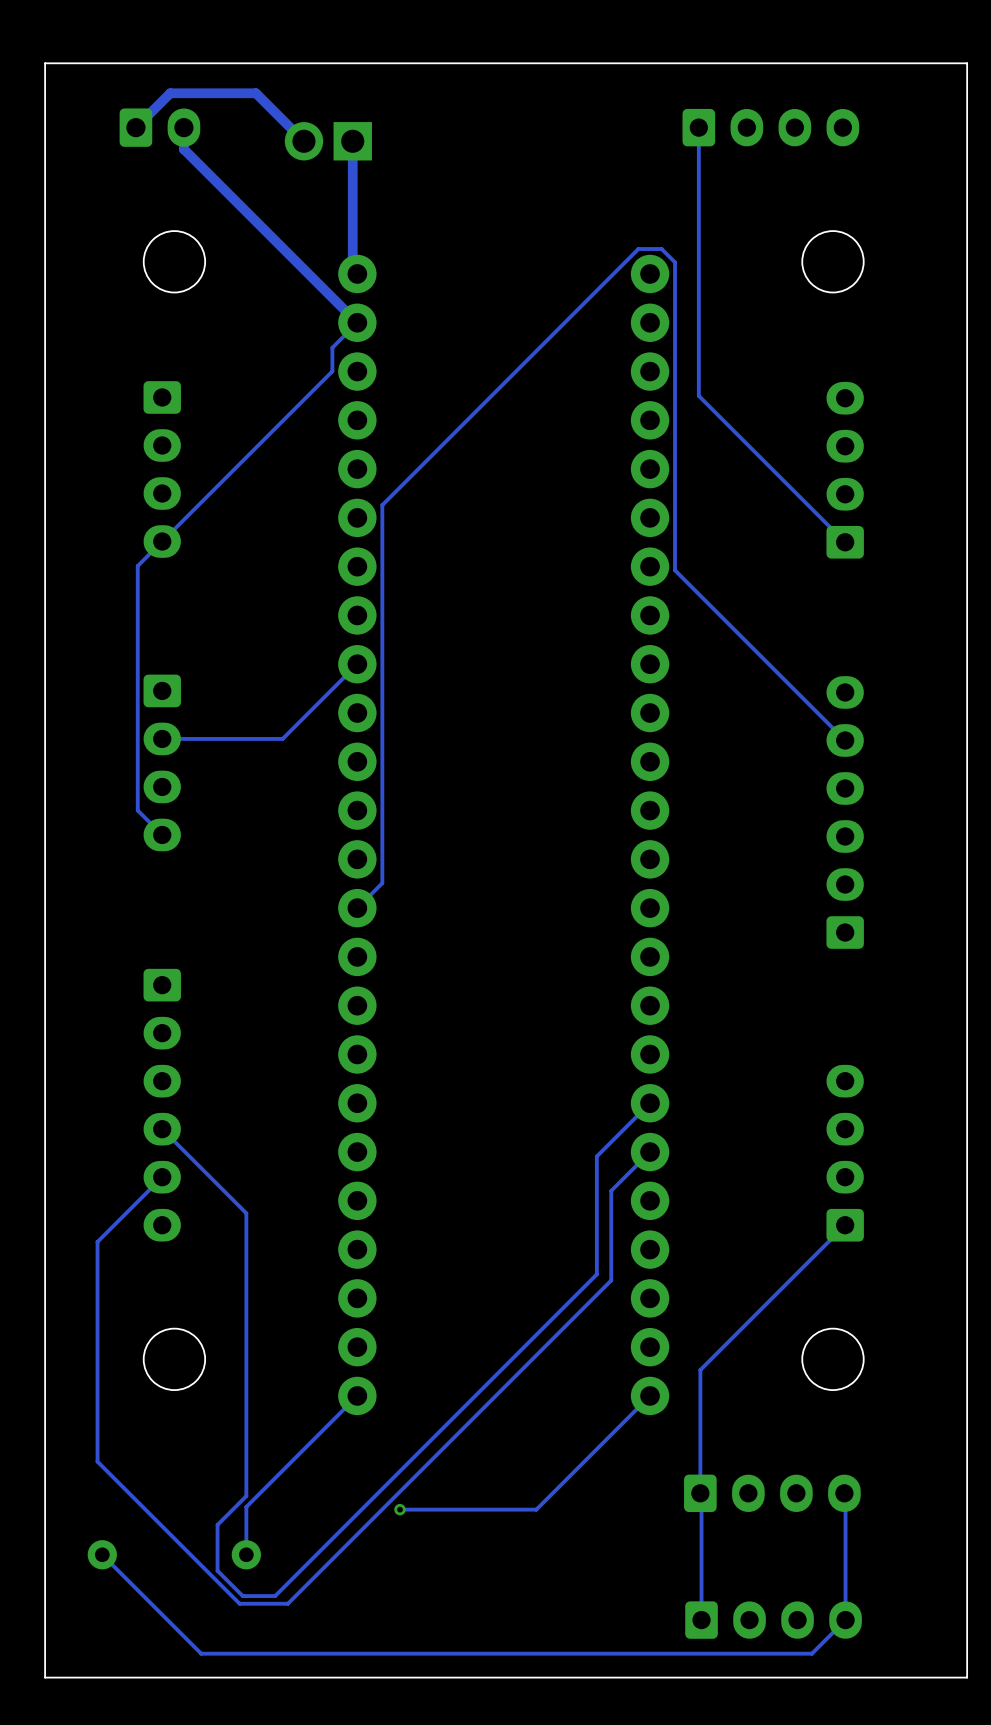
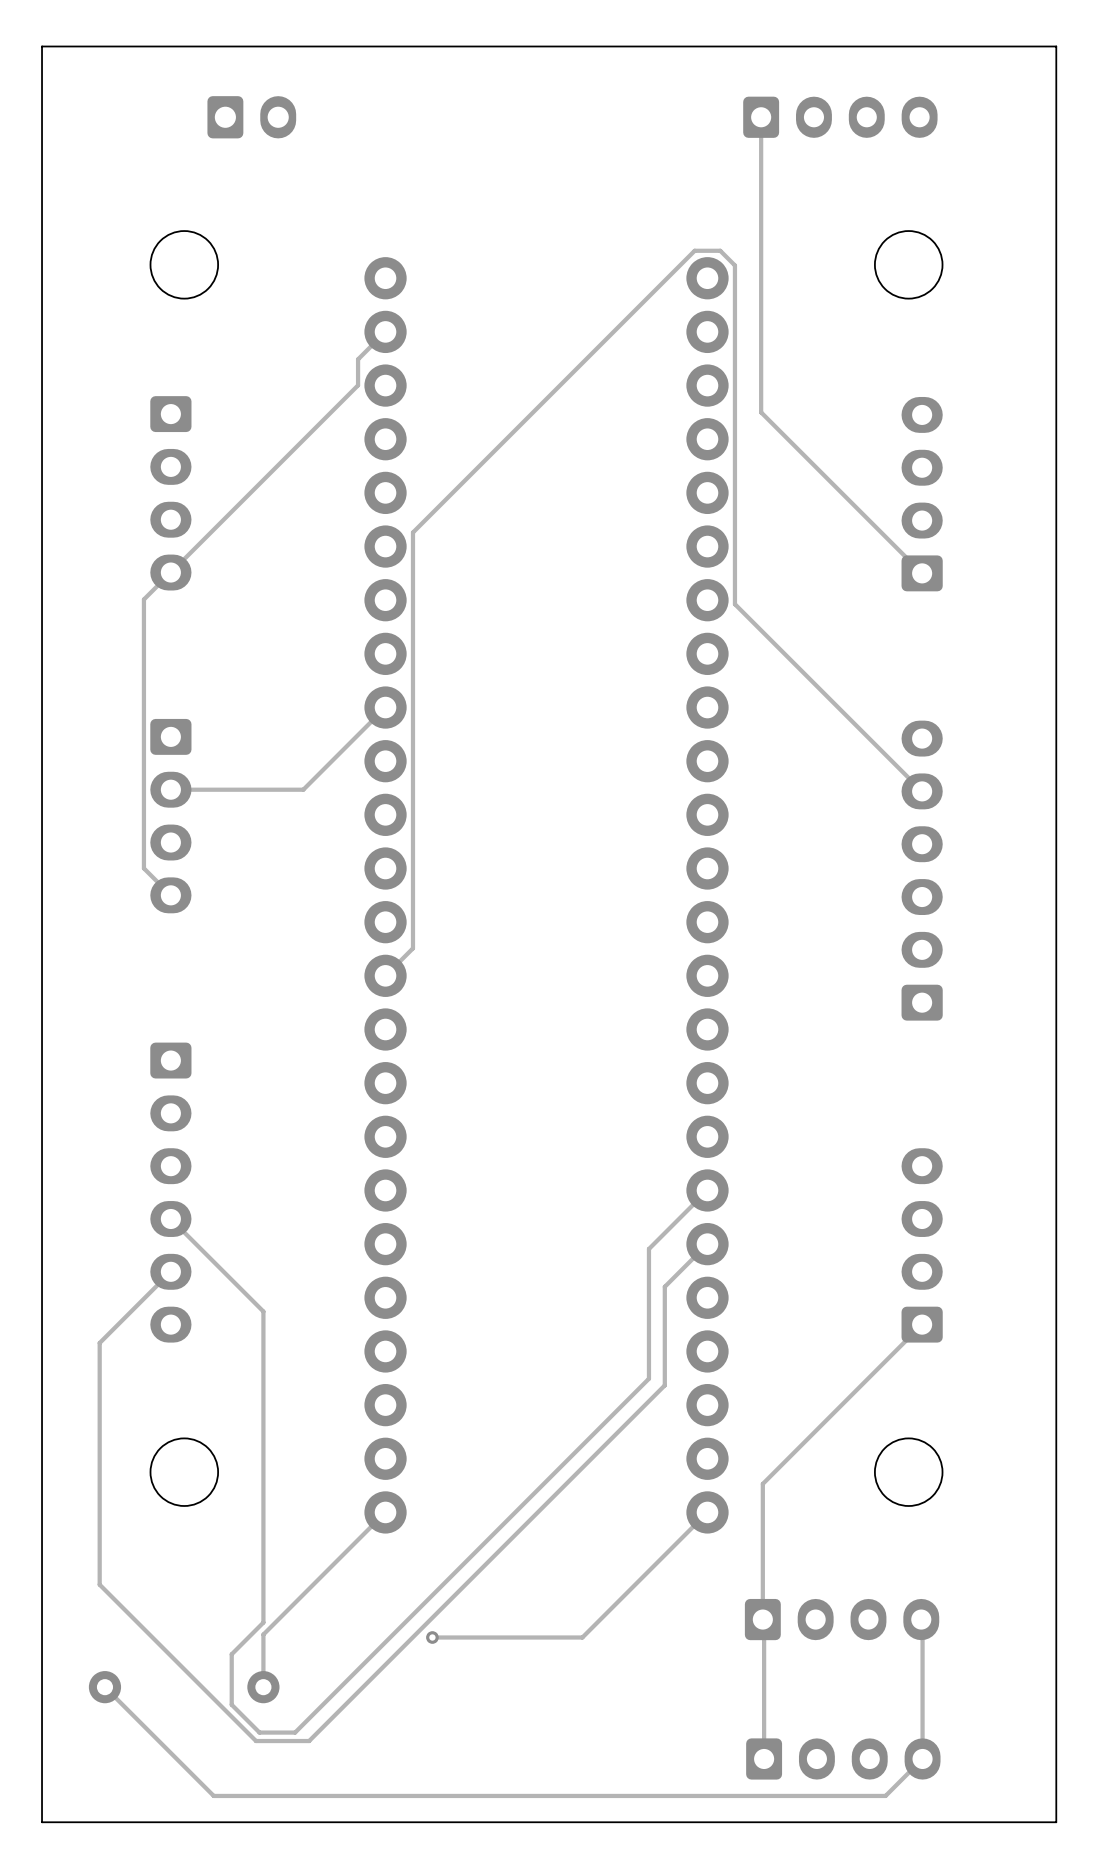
track: (135, 127) (170, 93) (255, 93) (303, 141) -> none
part position: (159, 127) -> (251, 117)
track: (183, 127) (183, 149) (357, 322) -> none
part: (328, 141) -> none
track: (352, 141) (352, 269) (357, 273) -> none

